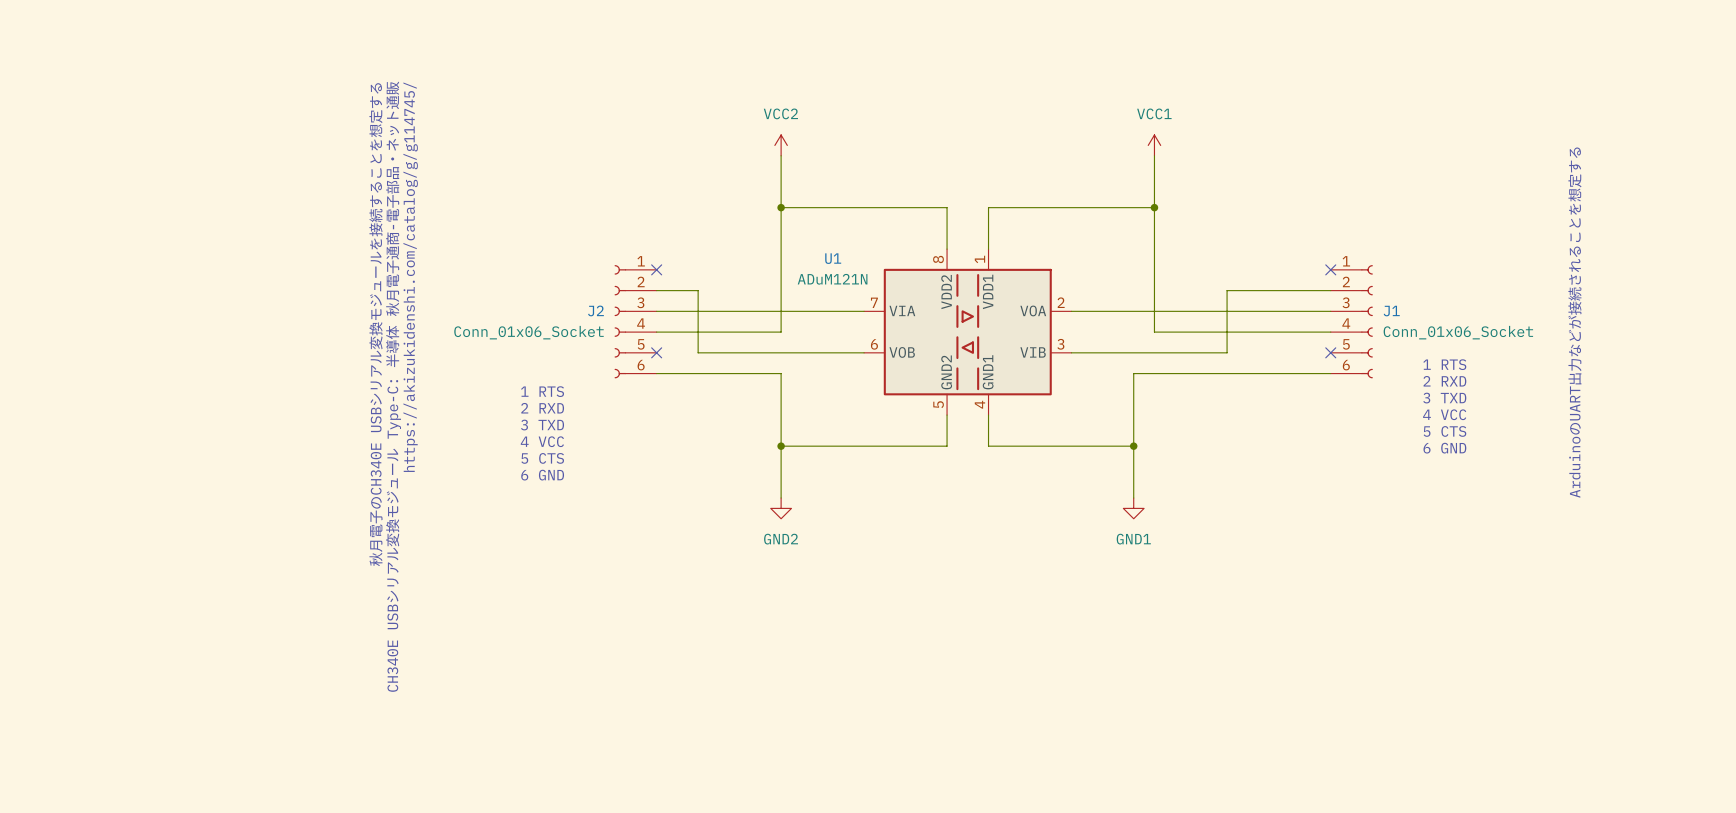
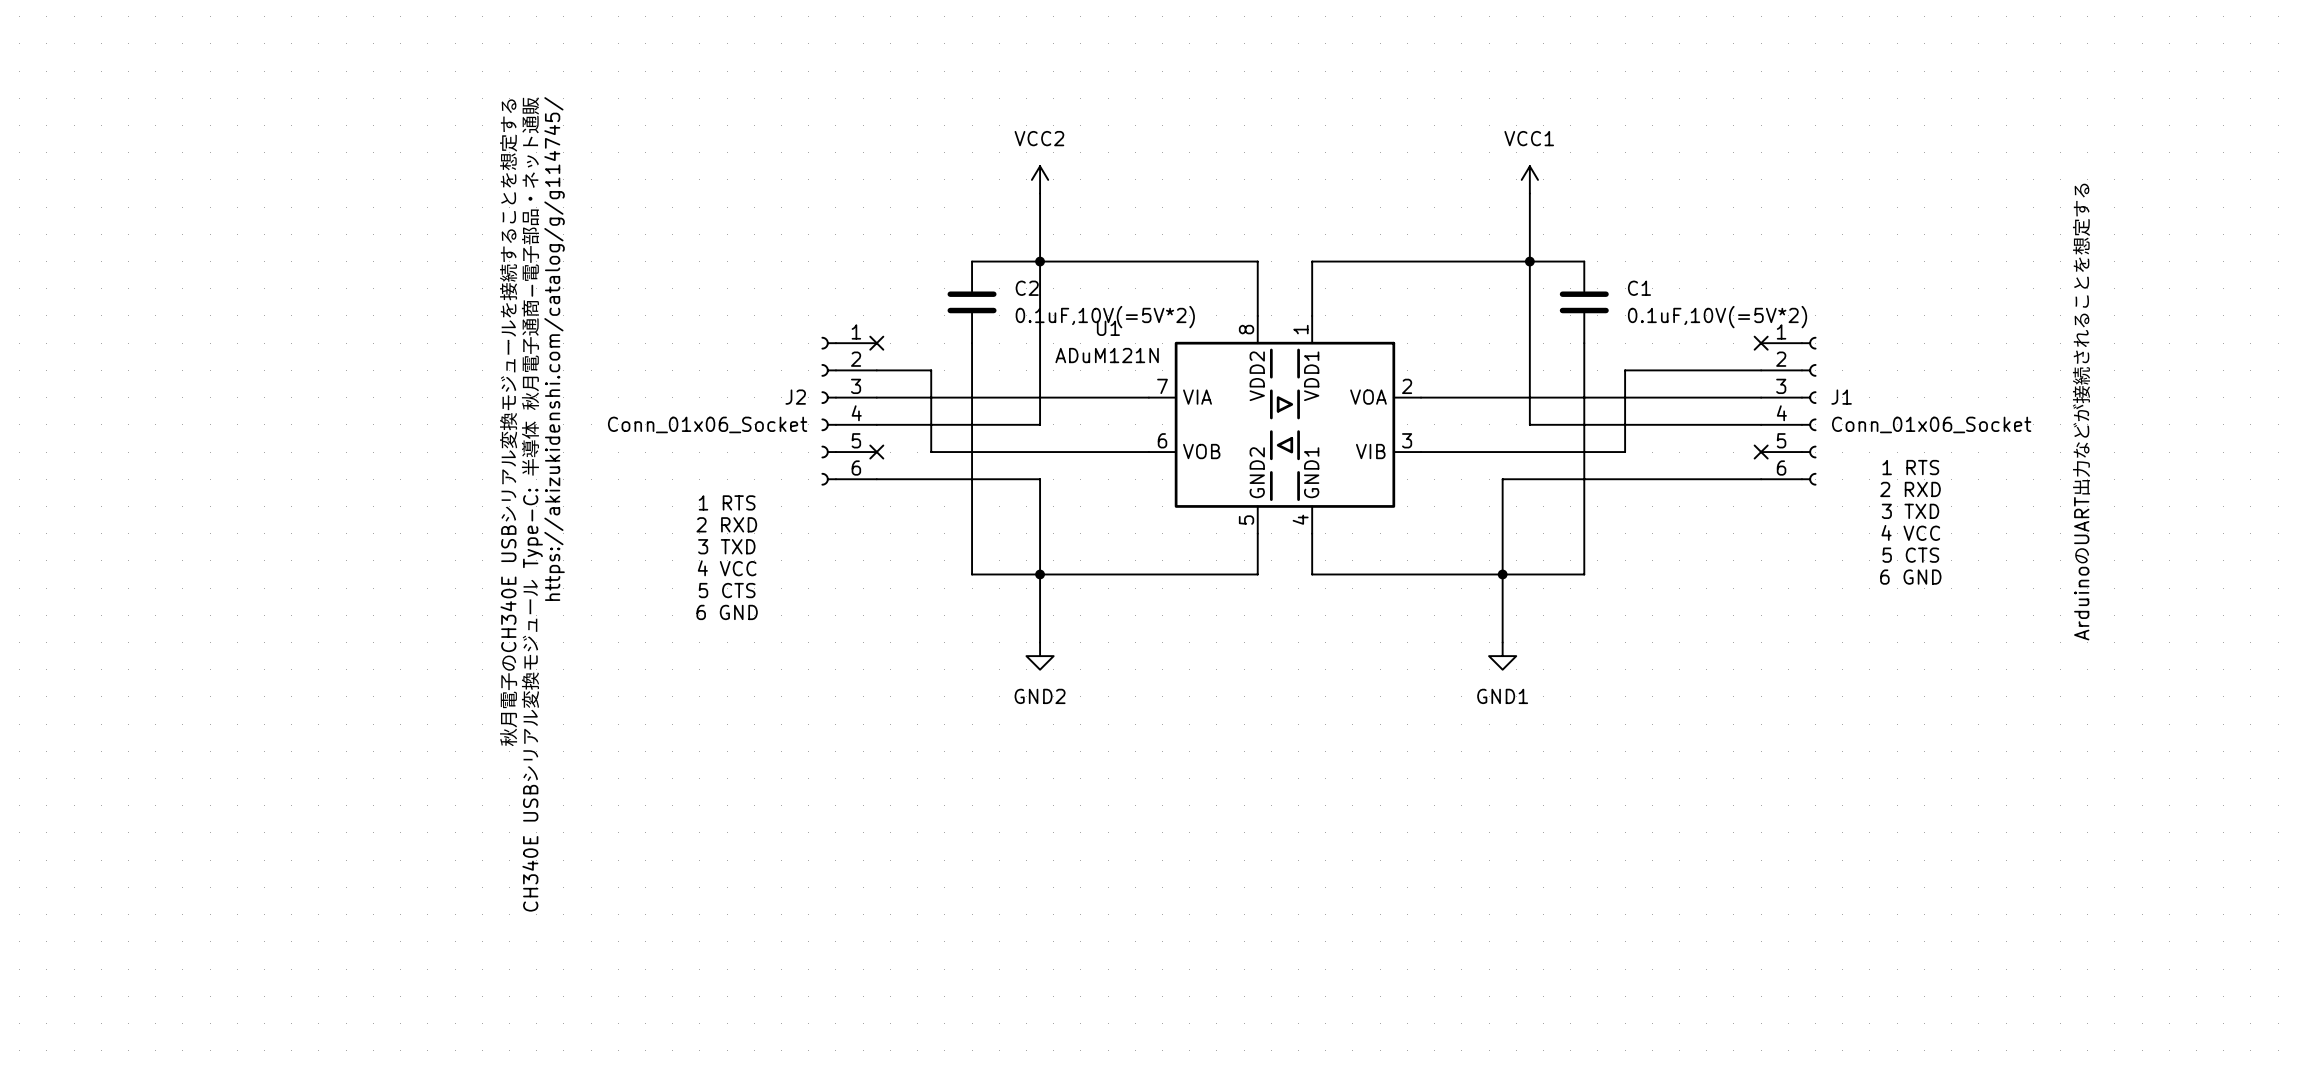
wire: none -> (972, 261) (1040, 261)
wire: none -> (1529, 261) (1584, 261)
C2: none -> 0.1uF,10V(=5V*2) (972, 302)
C1: none -> 0.1uF,10V(=5V*2) (1584, 302)
wire: none -> (972, 343) (972, 574) (1040, 574)
wire: none -> (1584, 343) (1584, 574) (1502, 574)

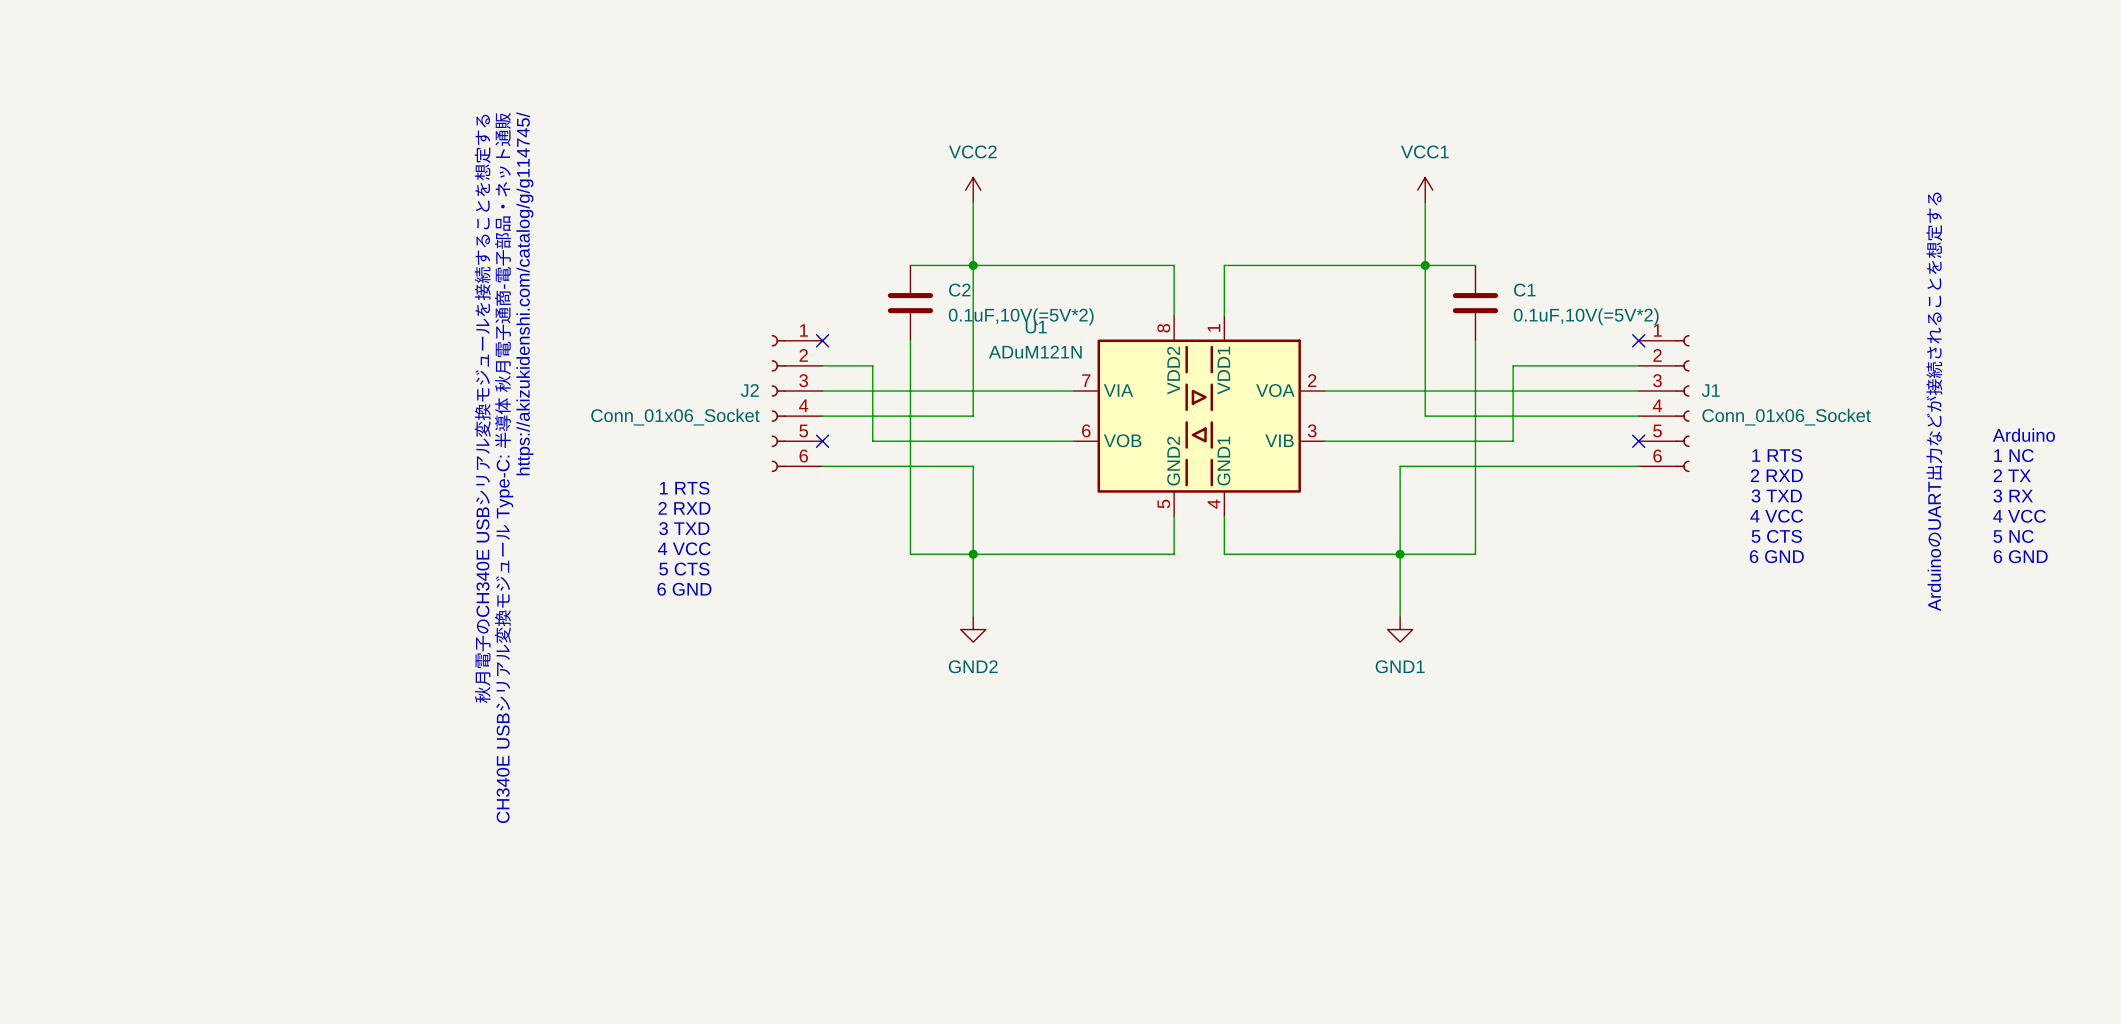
text: none -> Arduino (2023, 435)
text: none -> 1 NC (2013, 455)
text: none -> 2 TX (2012, 475)
text: none -> 3 RX (2013, 496)
text: none -> 4 VCC (2019, 516)
text: none -> 5 NC (2013, 536)
text: none -> 6 GND (2020, 556)

